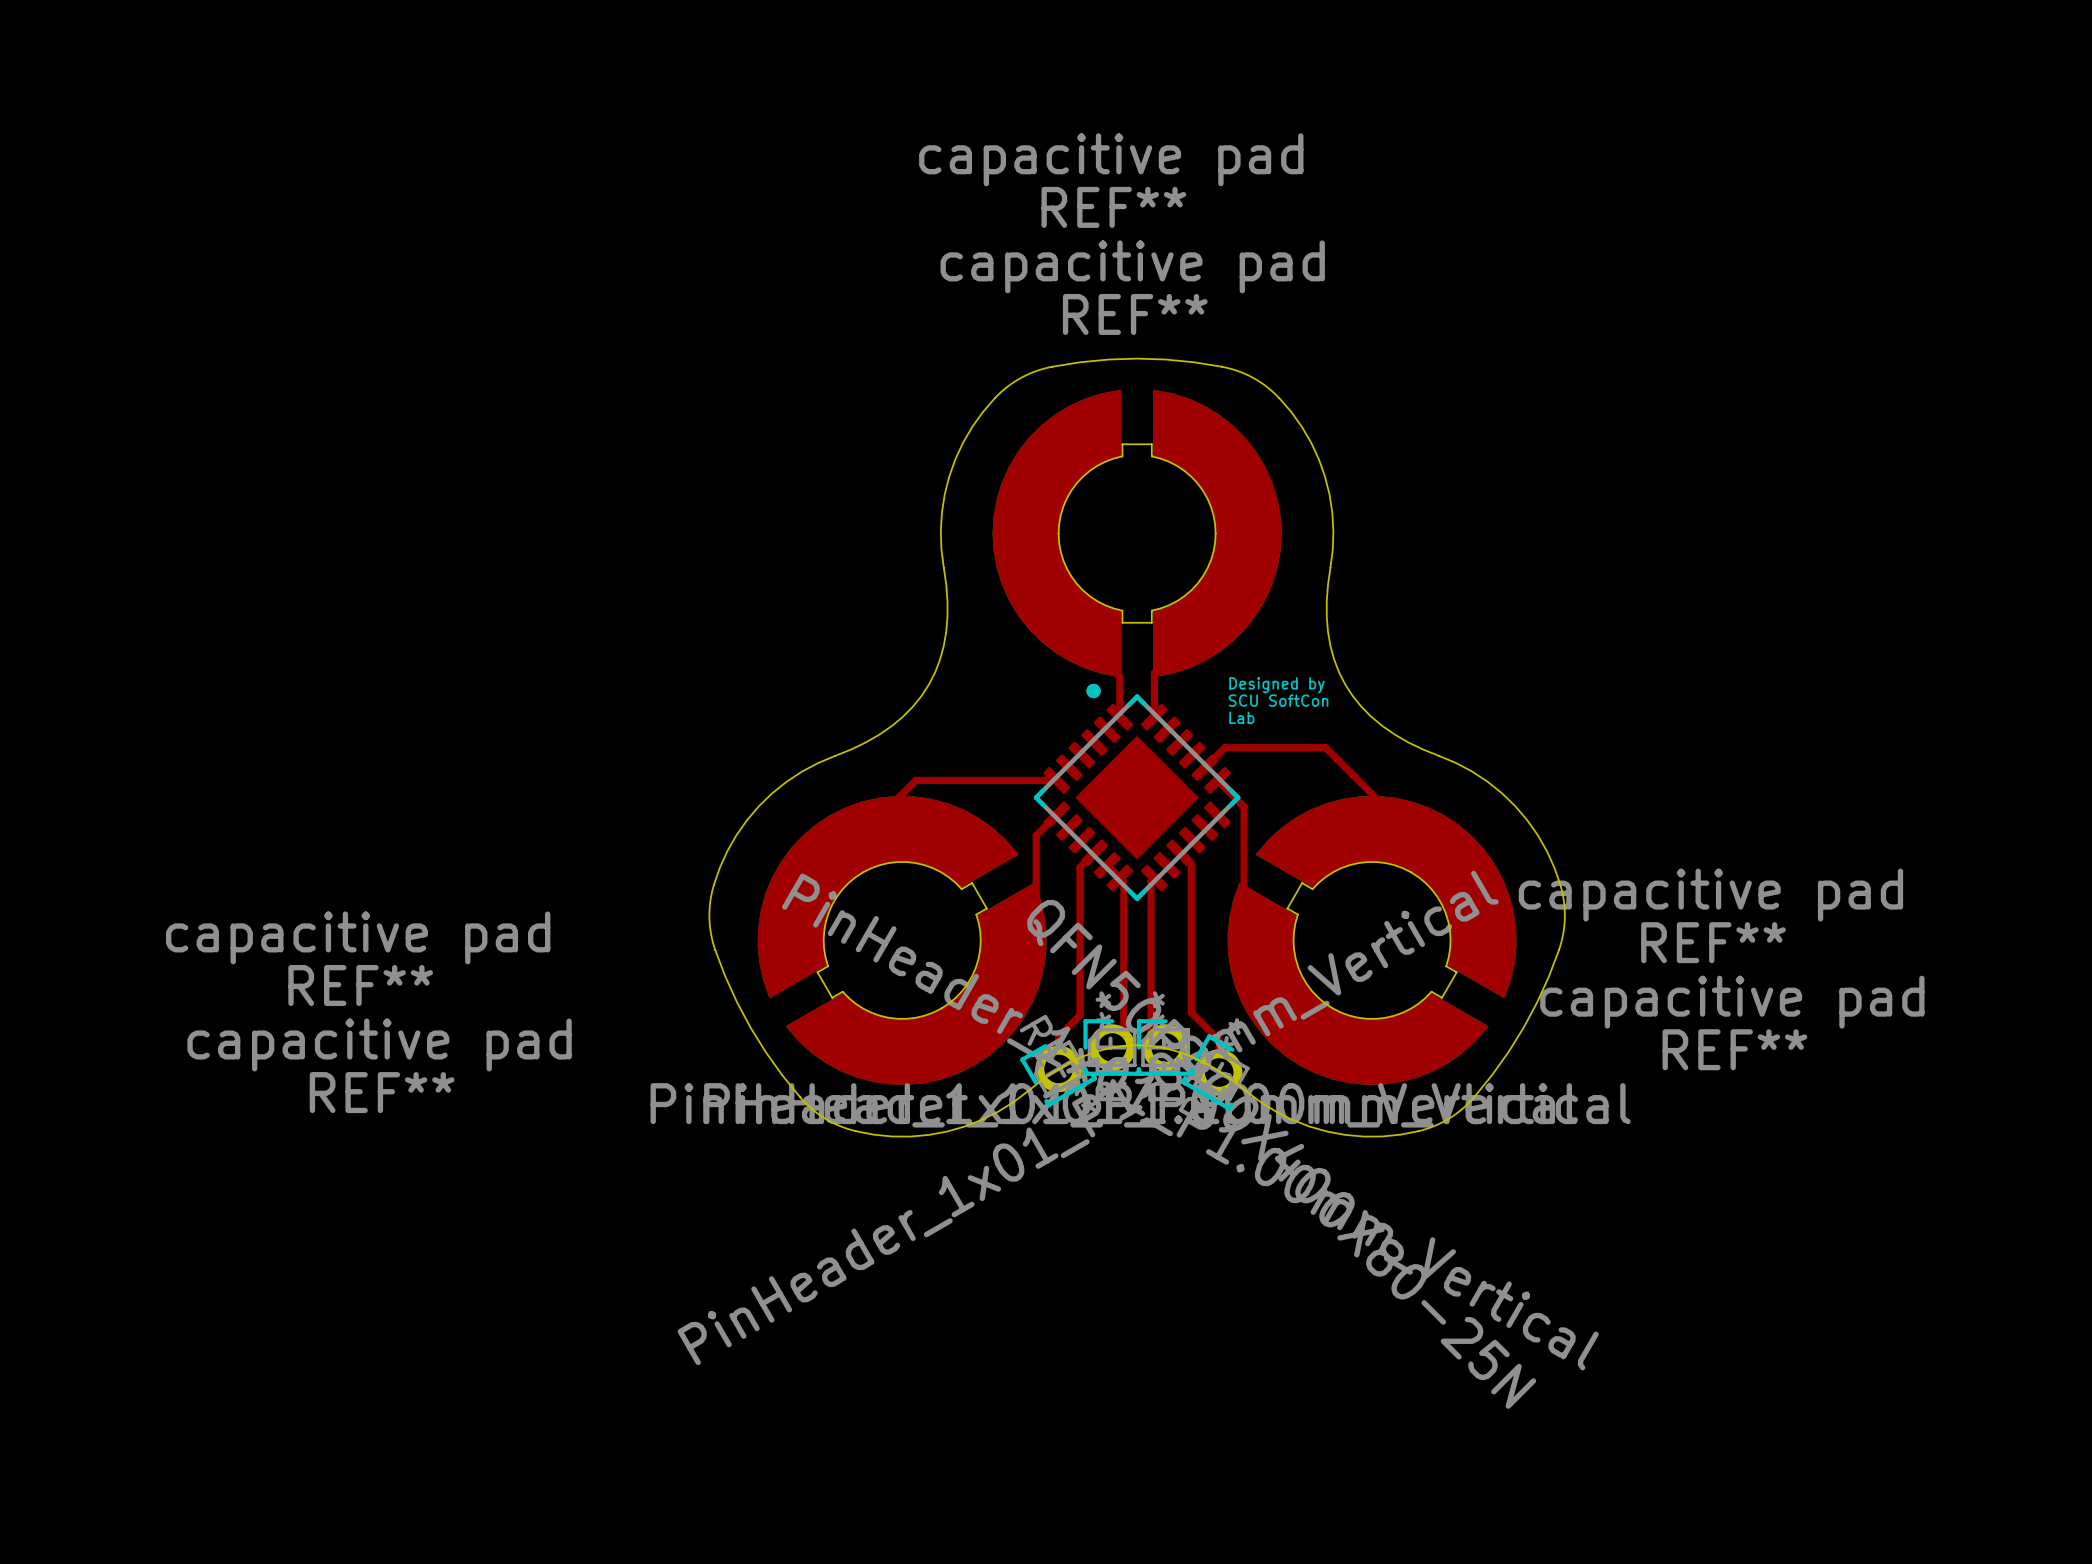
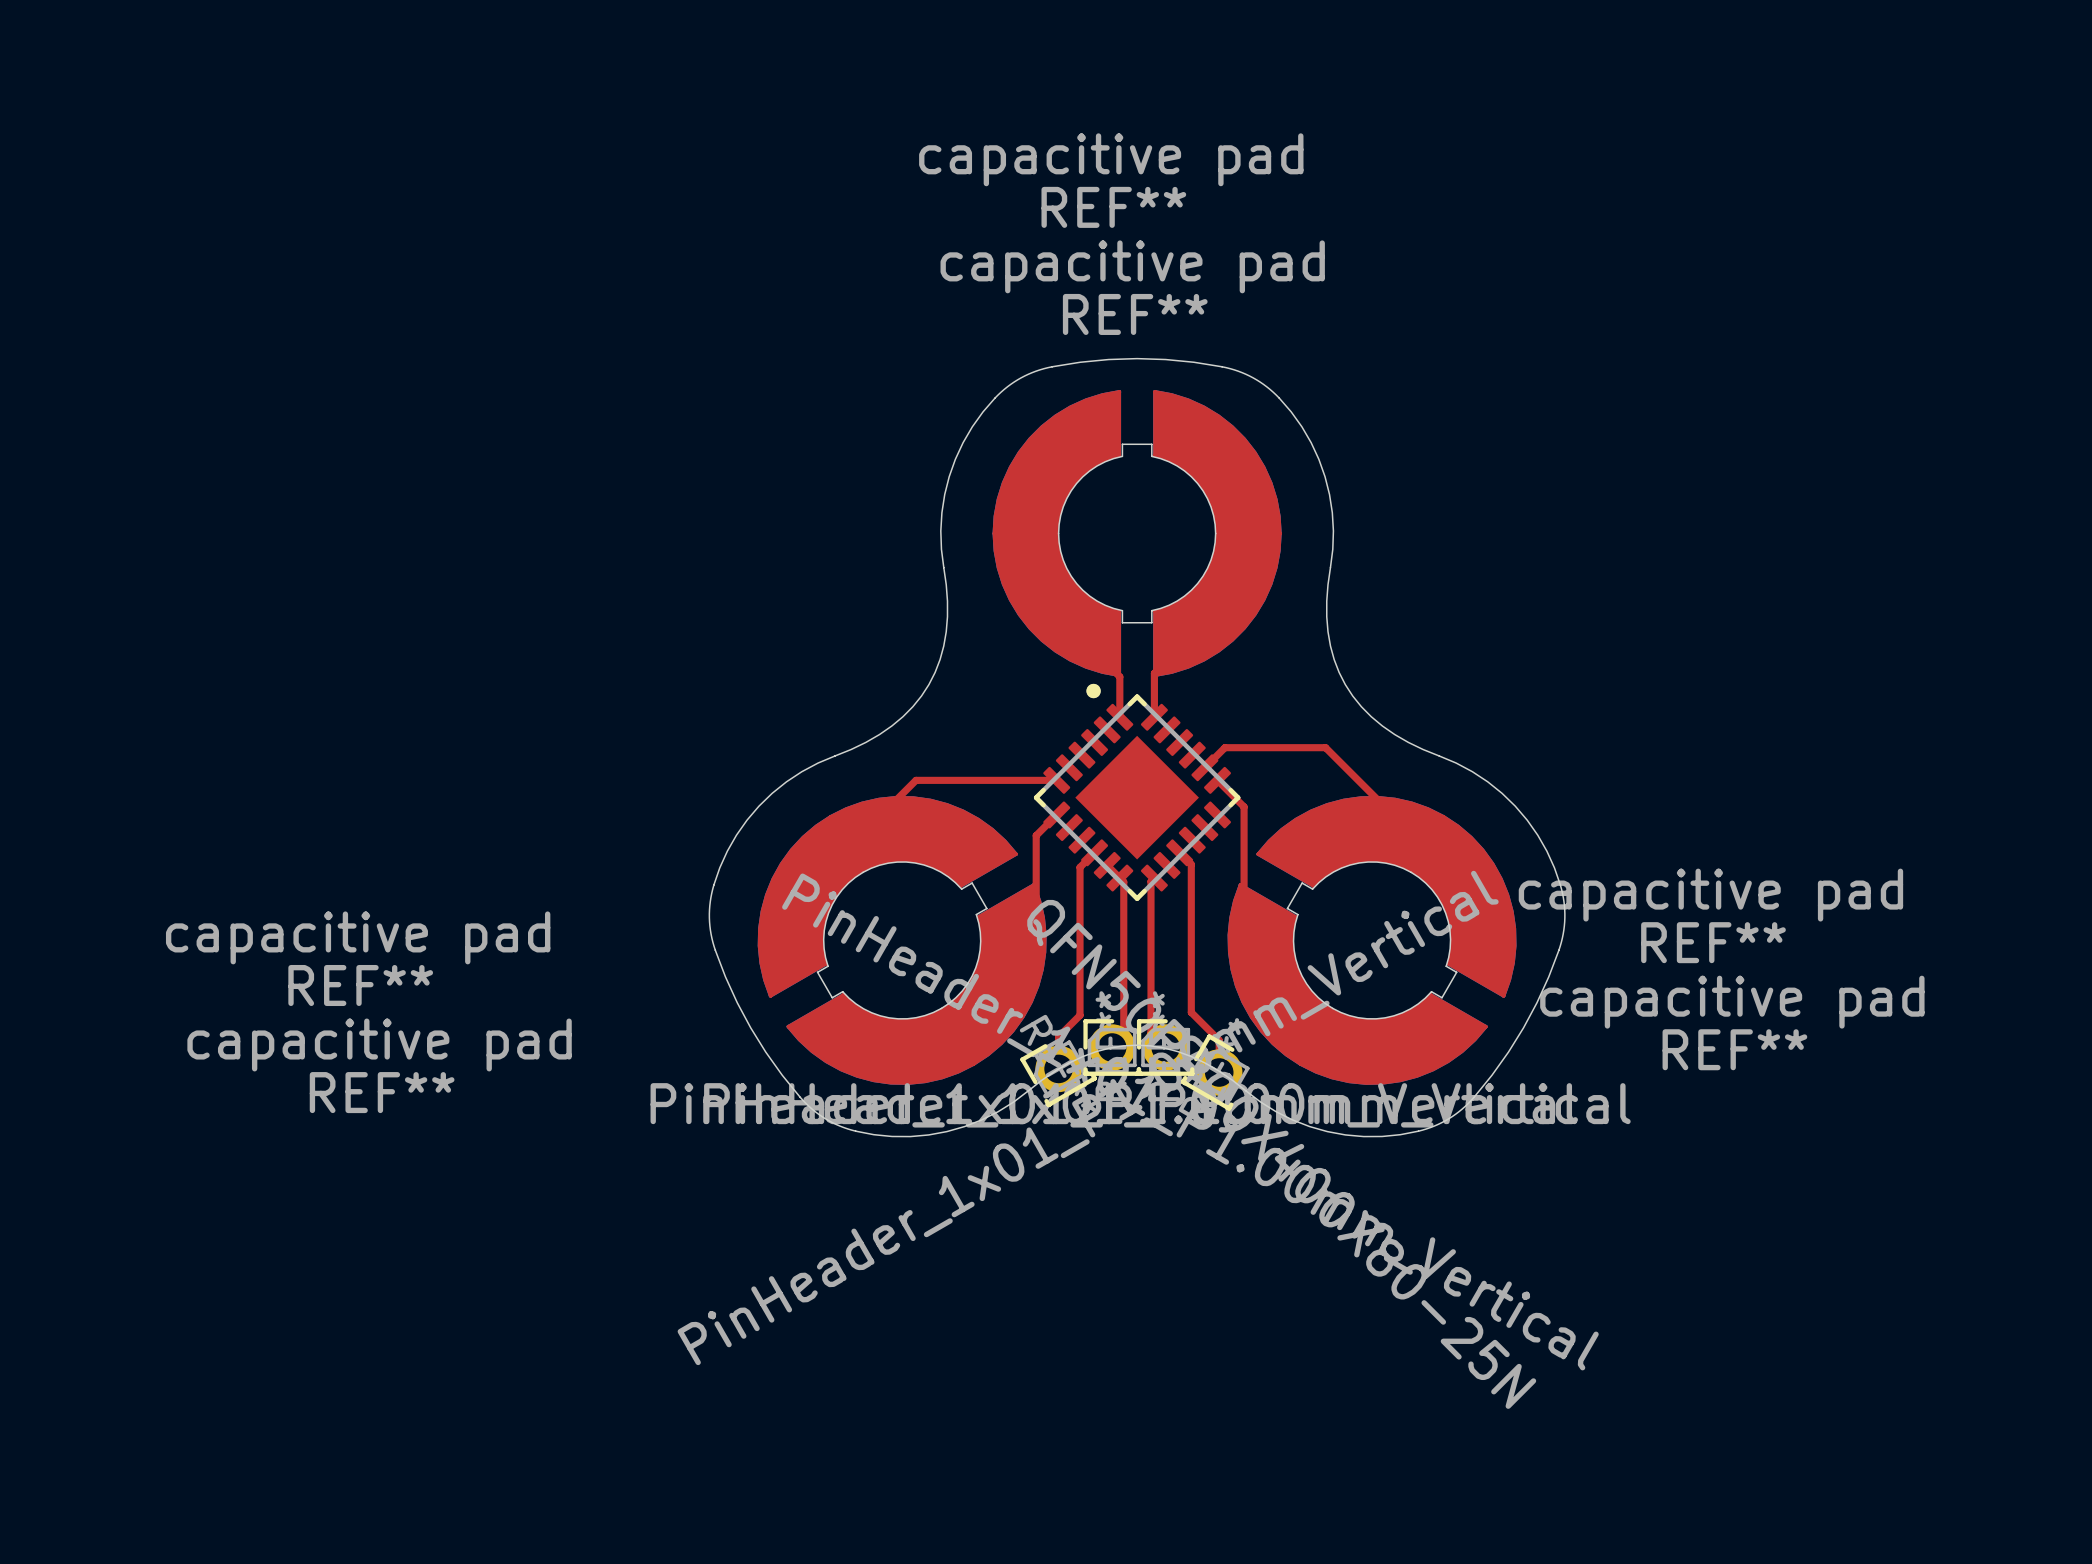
text: Designed by (1276, 685) -> none
text: SCU SoftCon (1278, 700) -> none
text: Lab (1241, 717) -> none

